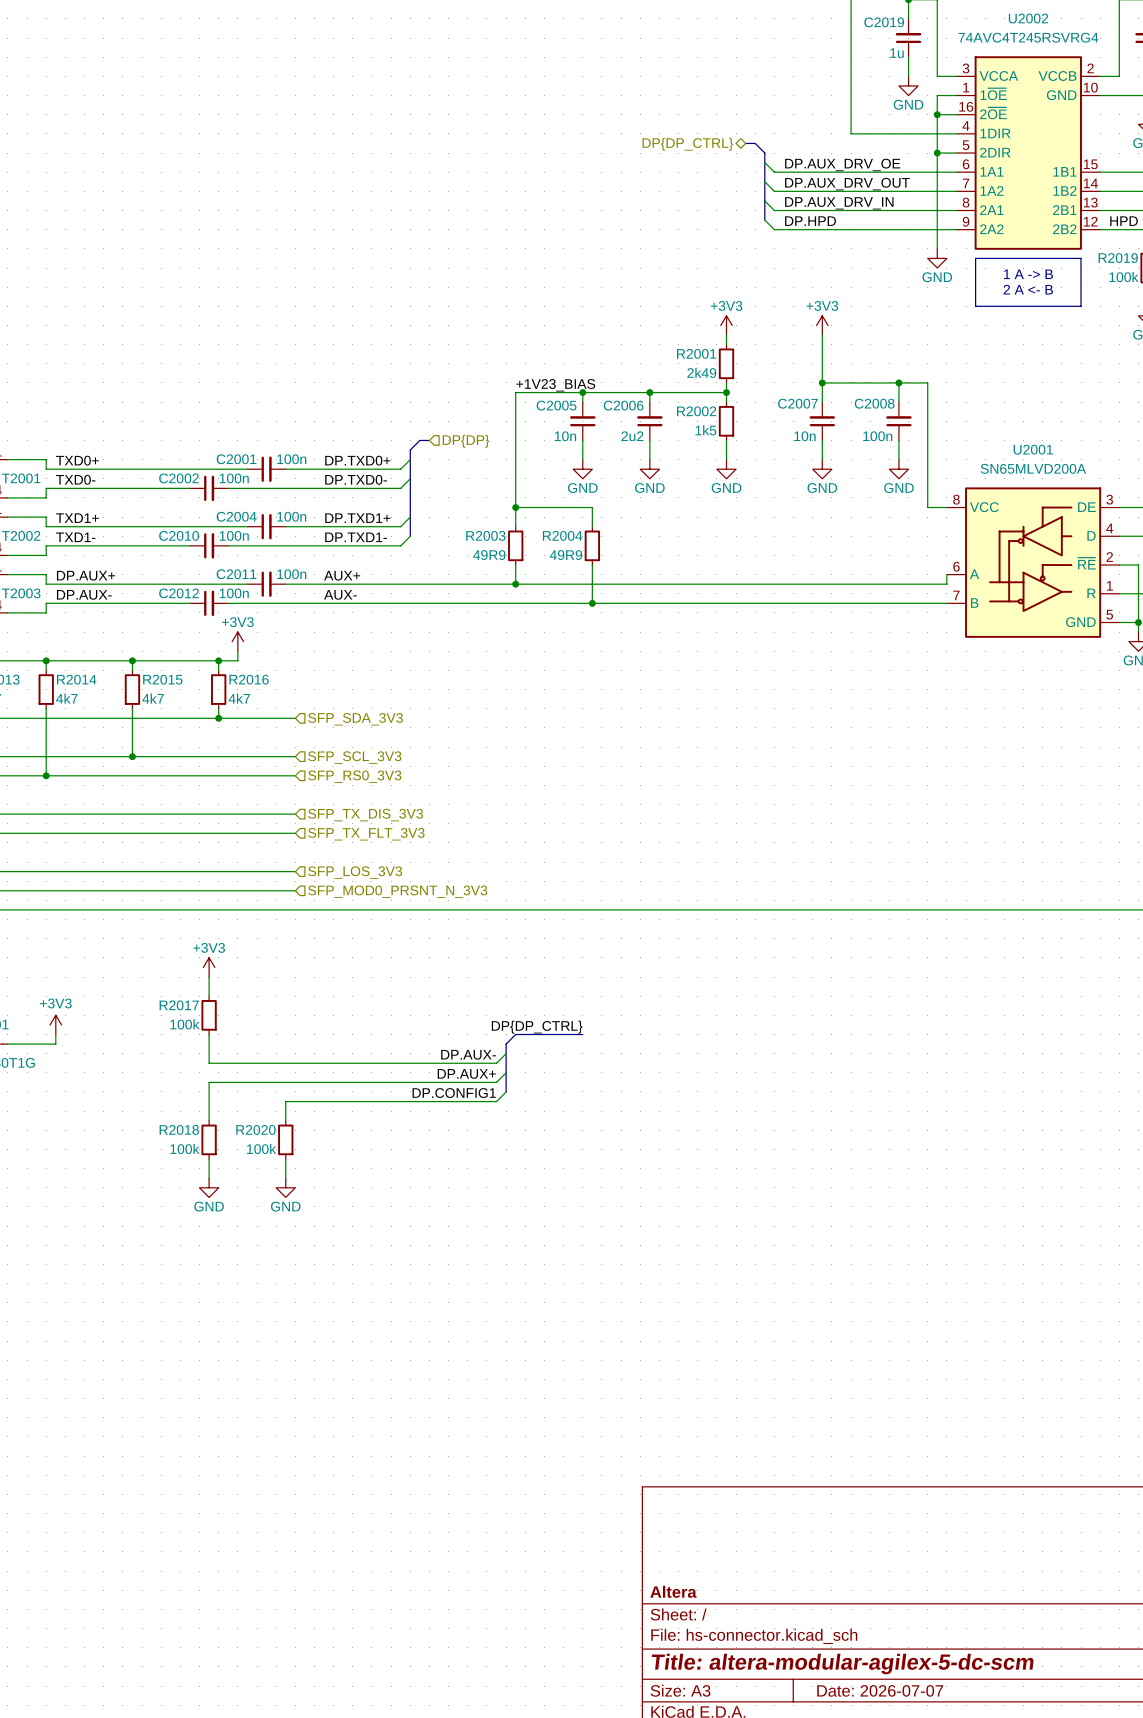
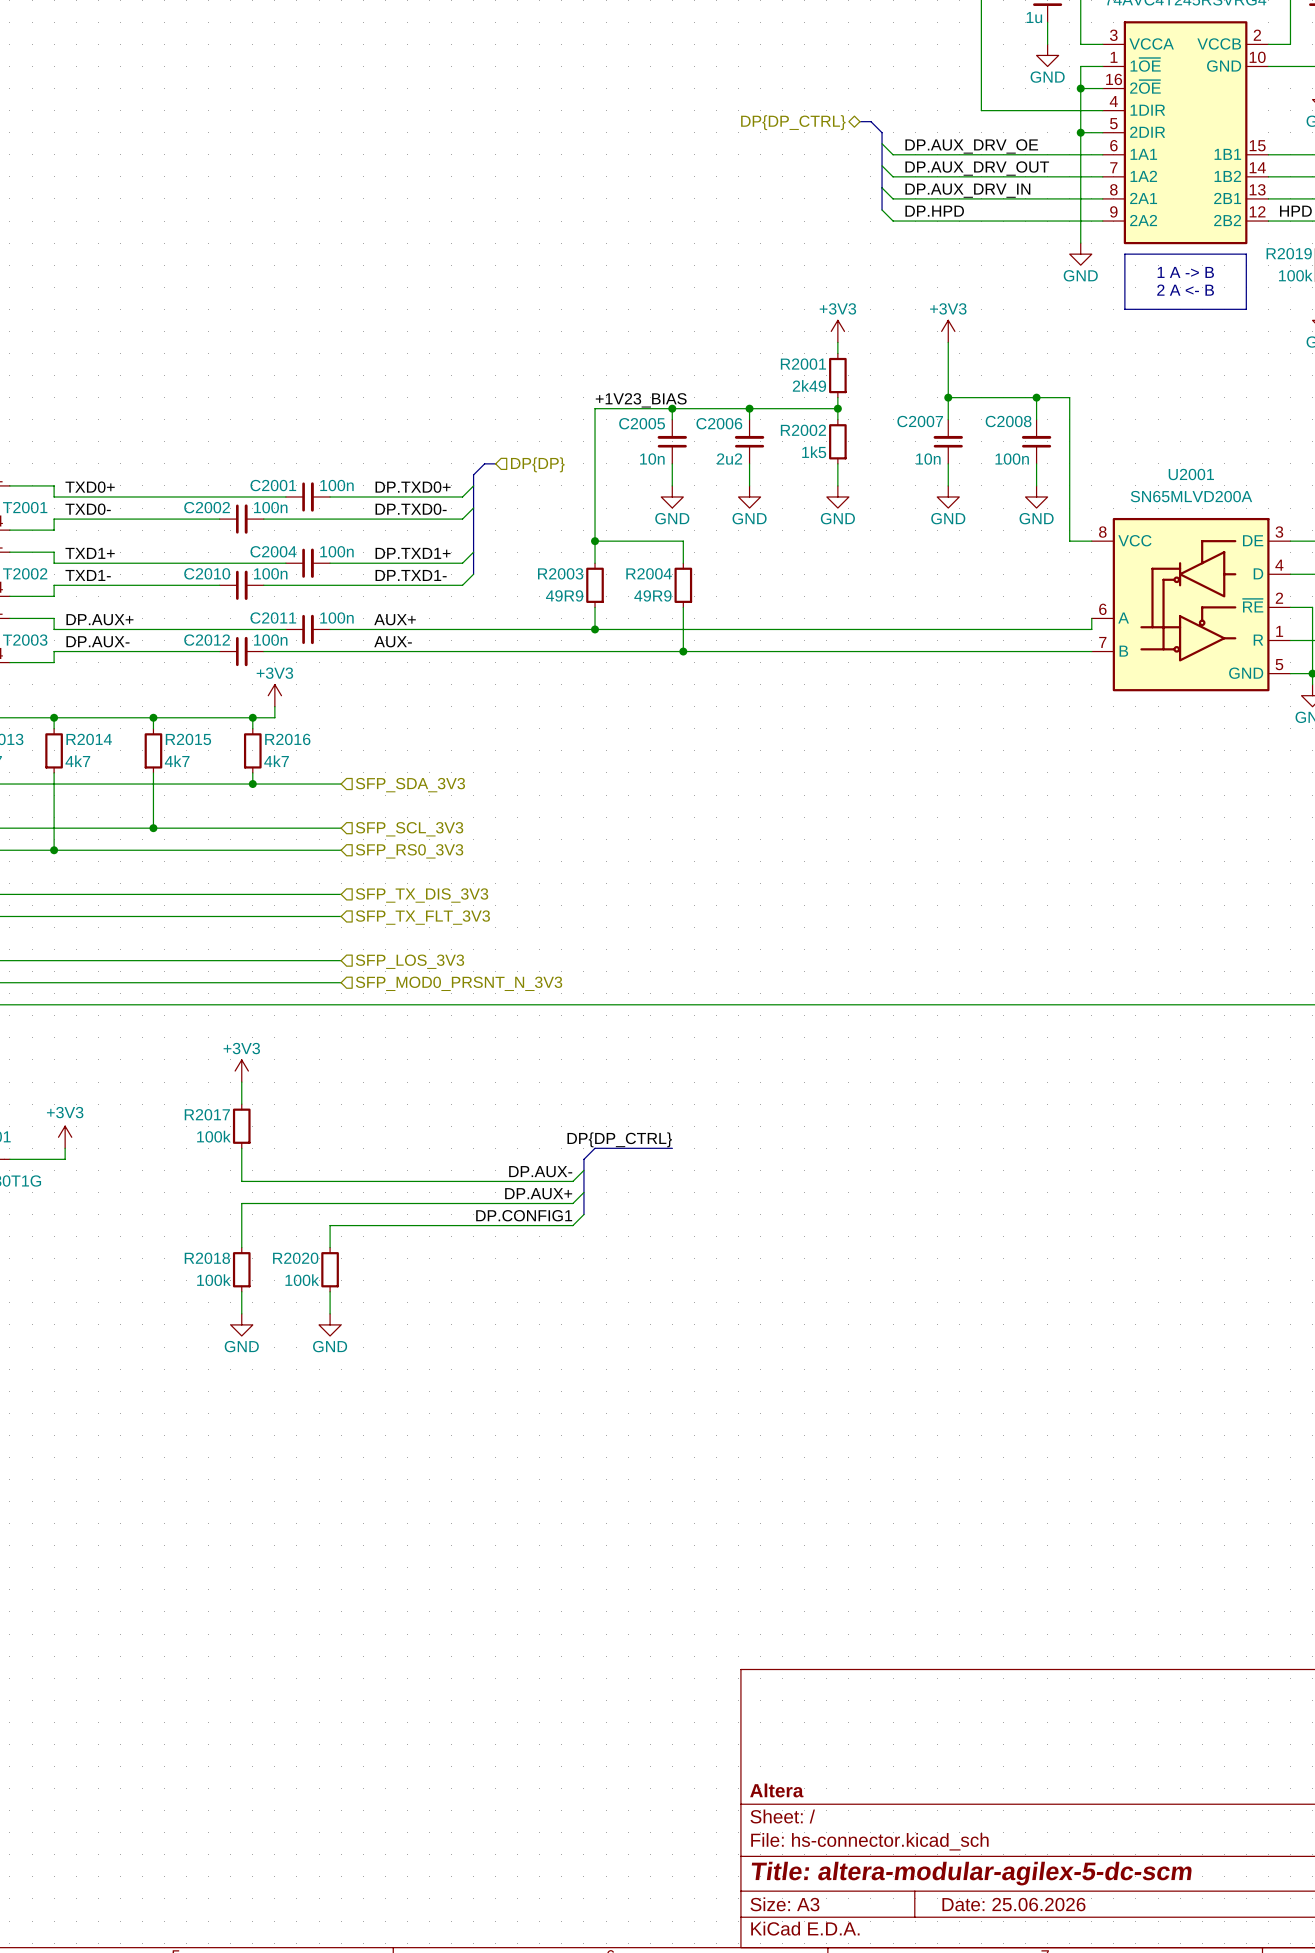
title block: Date: 2026-07-07 (880, 1690) -> Date: 25.06.2026 (1013, 1904)

